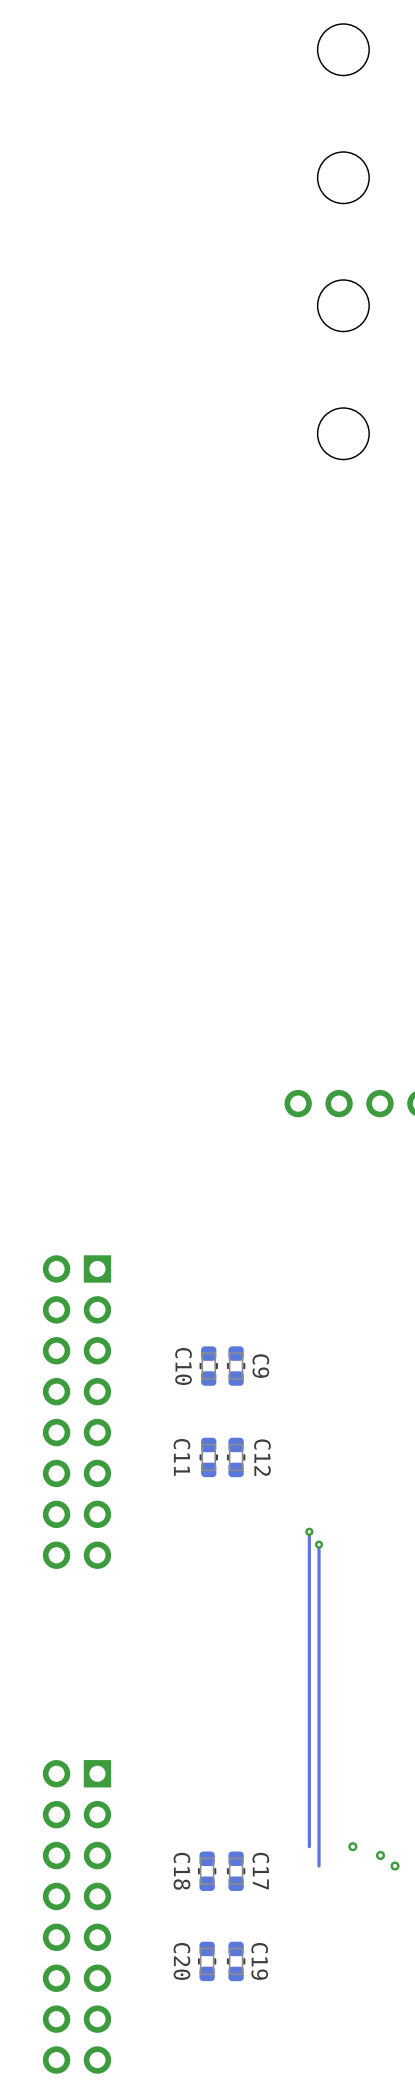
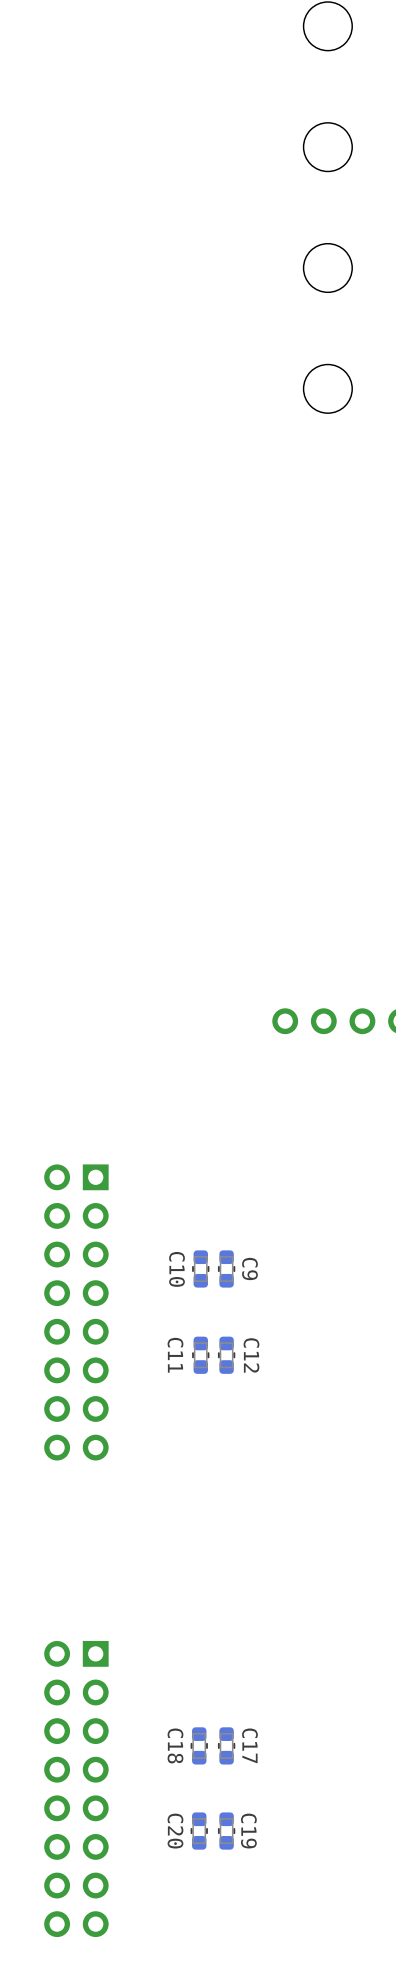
track: (309, 1531) (309, 1846) -> none
via: (309, 1531) -> none
track: (319, 1544) (319, 1866) -> none
via: (319, 1544) -> none
via: (352, 1846) -> none
via: (380, 1855) -> none
via: (395, 1866) -> none

